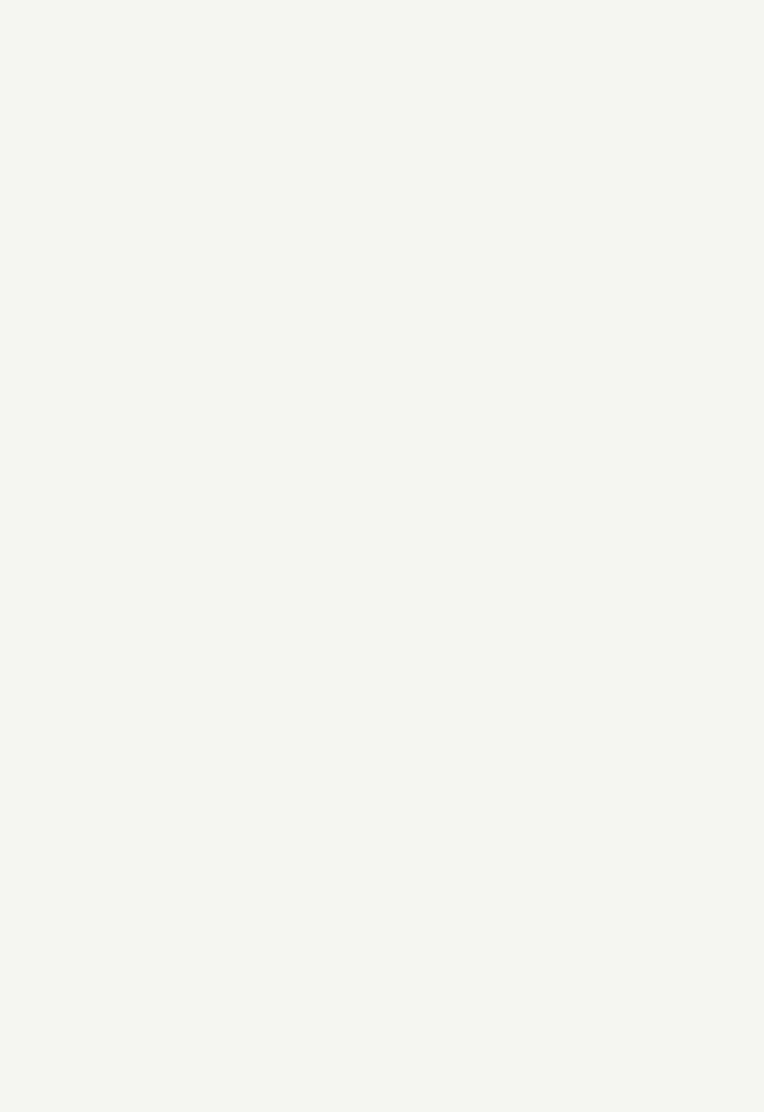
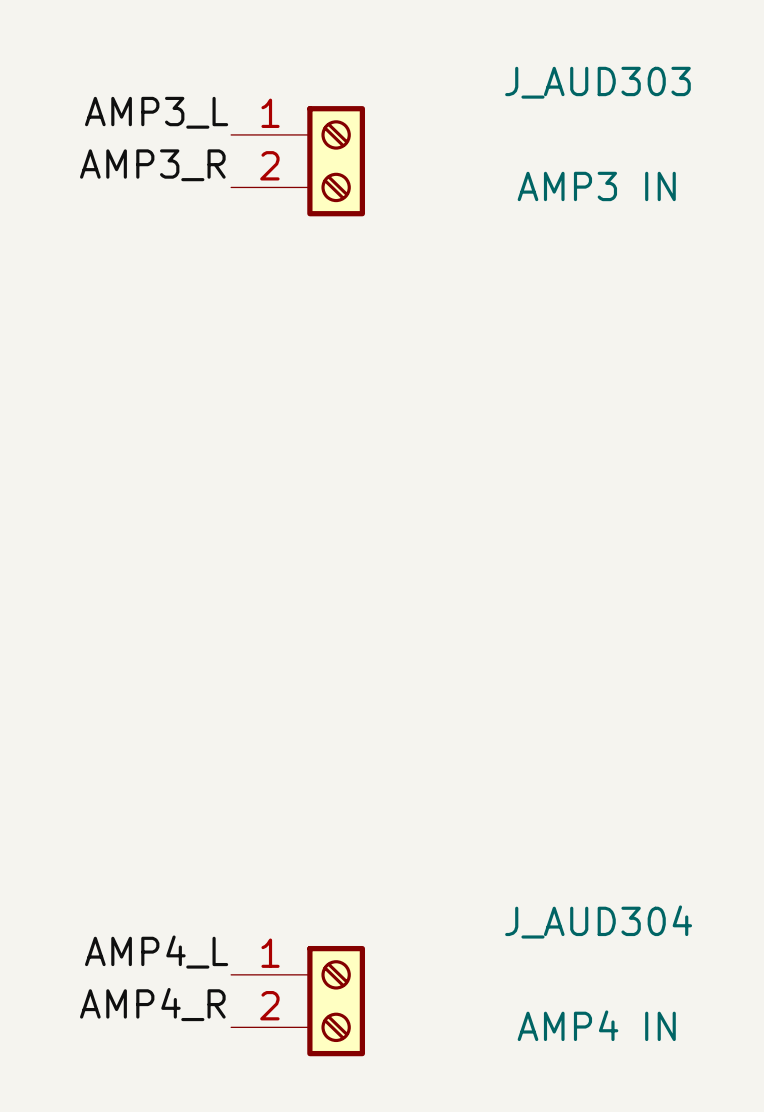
label: none -> AMP3_L (156, 112)
J_AUD303: none -> AMP3 IN (298, 161)
label: none -> AMP3_R (152, 165)
label: none -> AMP4_L (156, 952)
J_AUD304: none -> AMP4 IN (298, 1001)
label: none -> AMP4_R (152, 1004)

